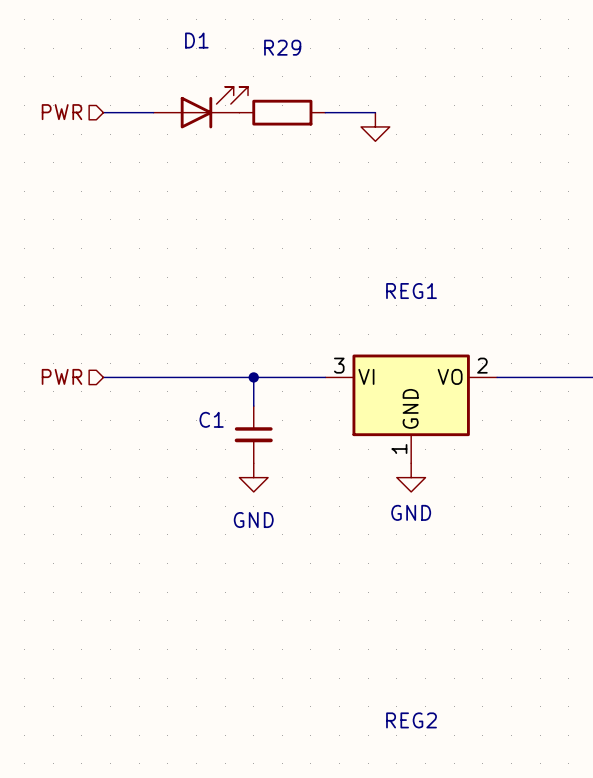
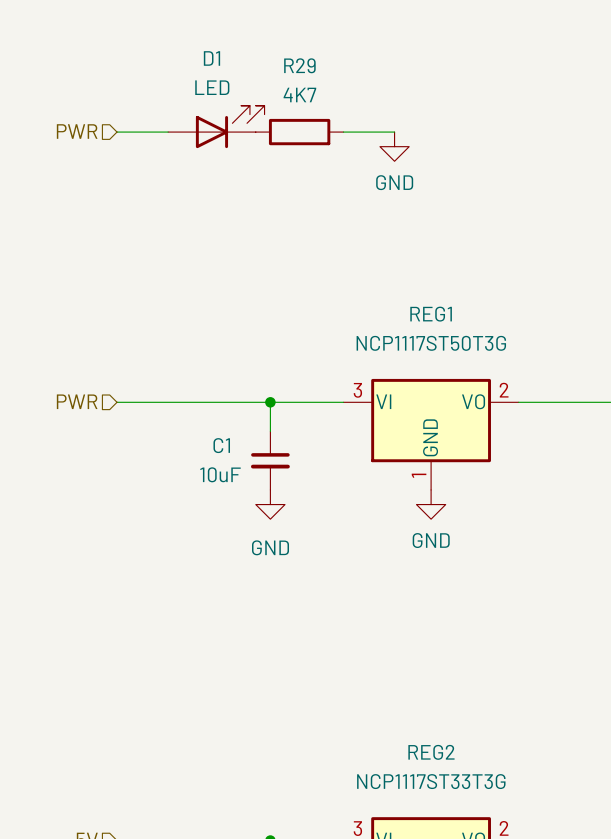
D1 value: none -> LED (212, 87)
R29 value: none -> 4K7 (299, 94)
power symbol text: none -> GND (394, 182)
REG1 value: none -> NCP1117ST50T3G (431, 343)
C1 value: none -> 10uF (220, 474)
REG2 value: none -> NCP1117ST33T3G (431, 781)

